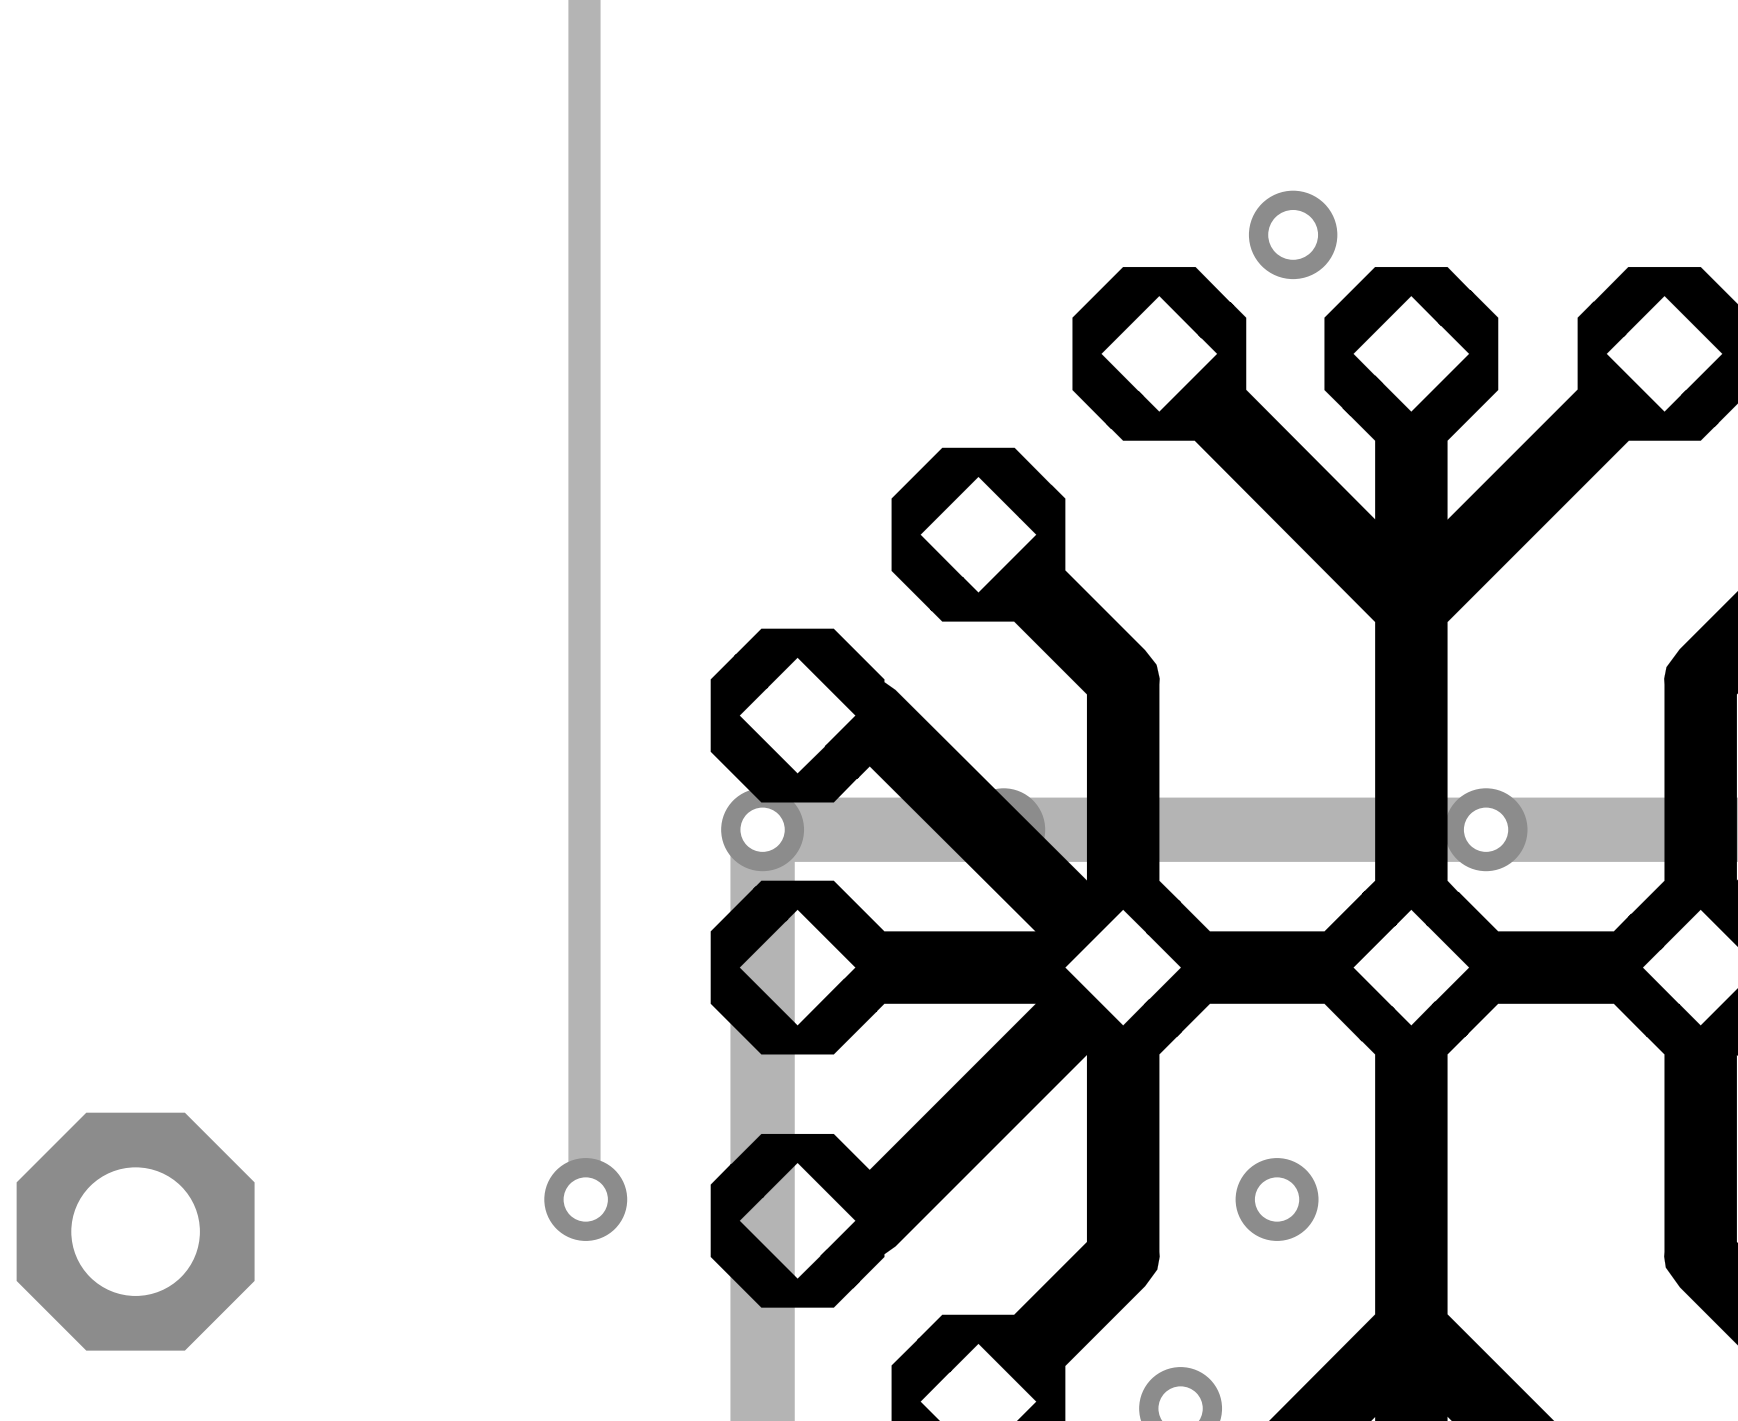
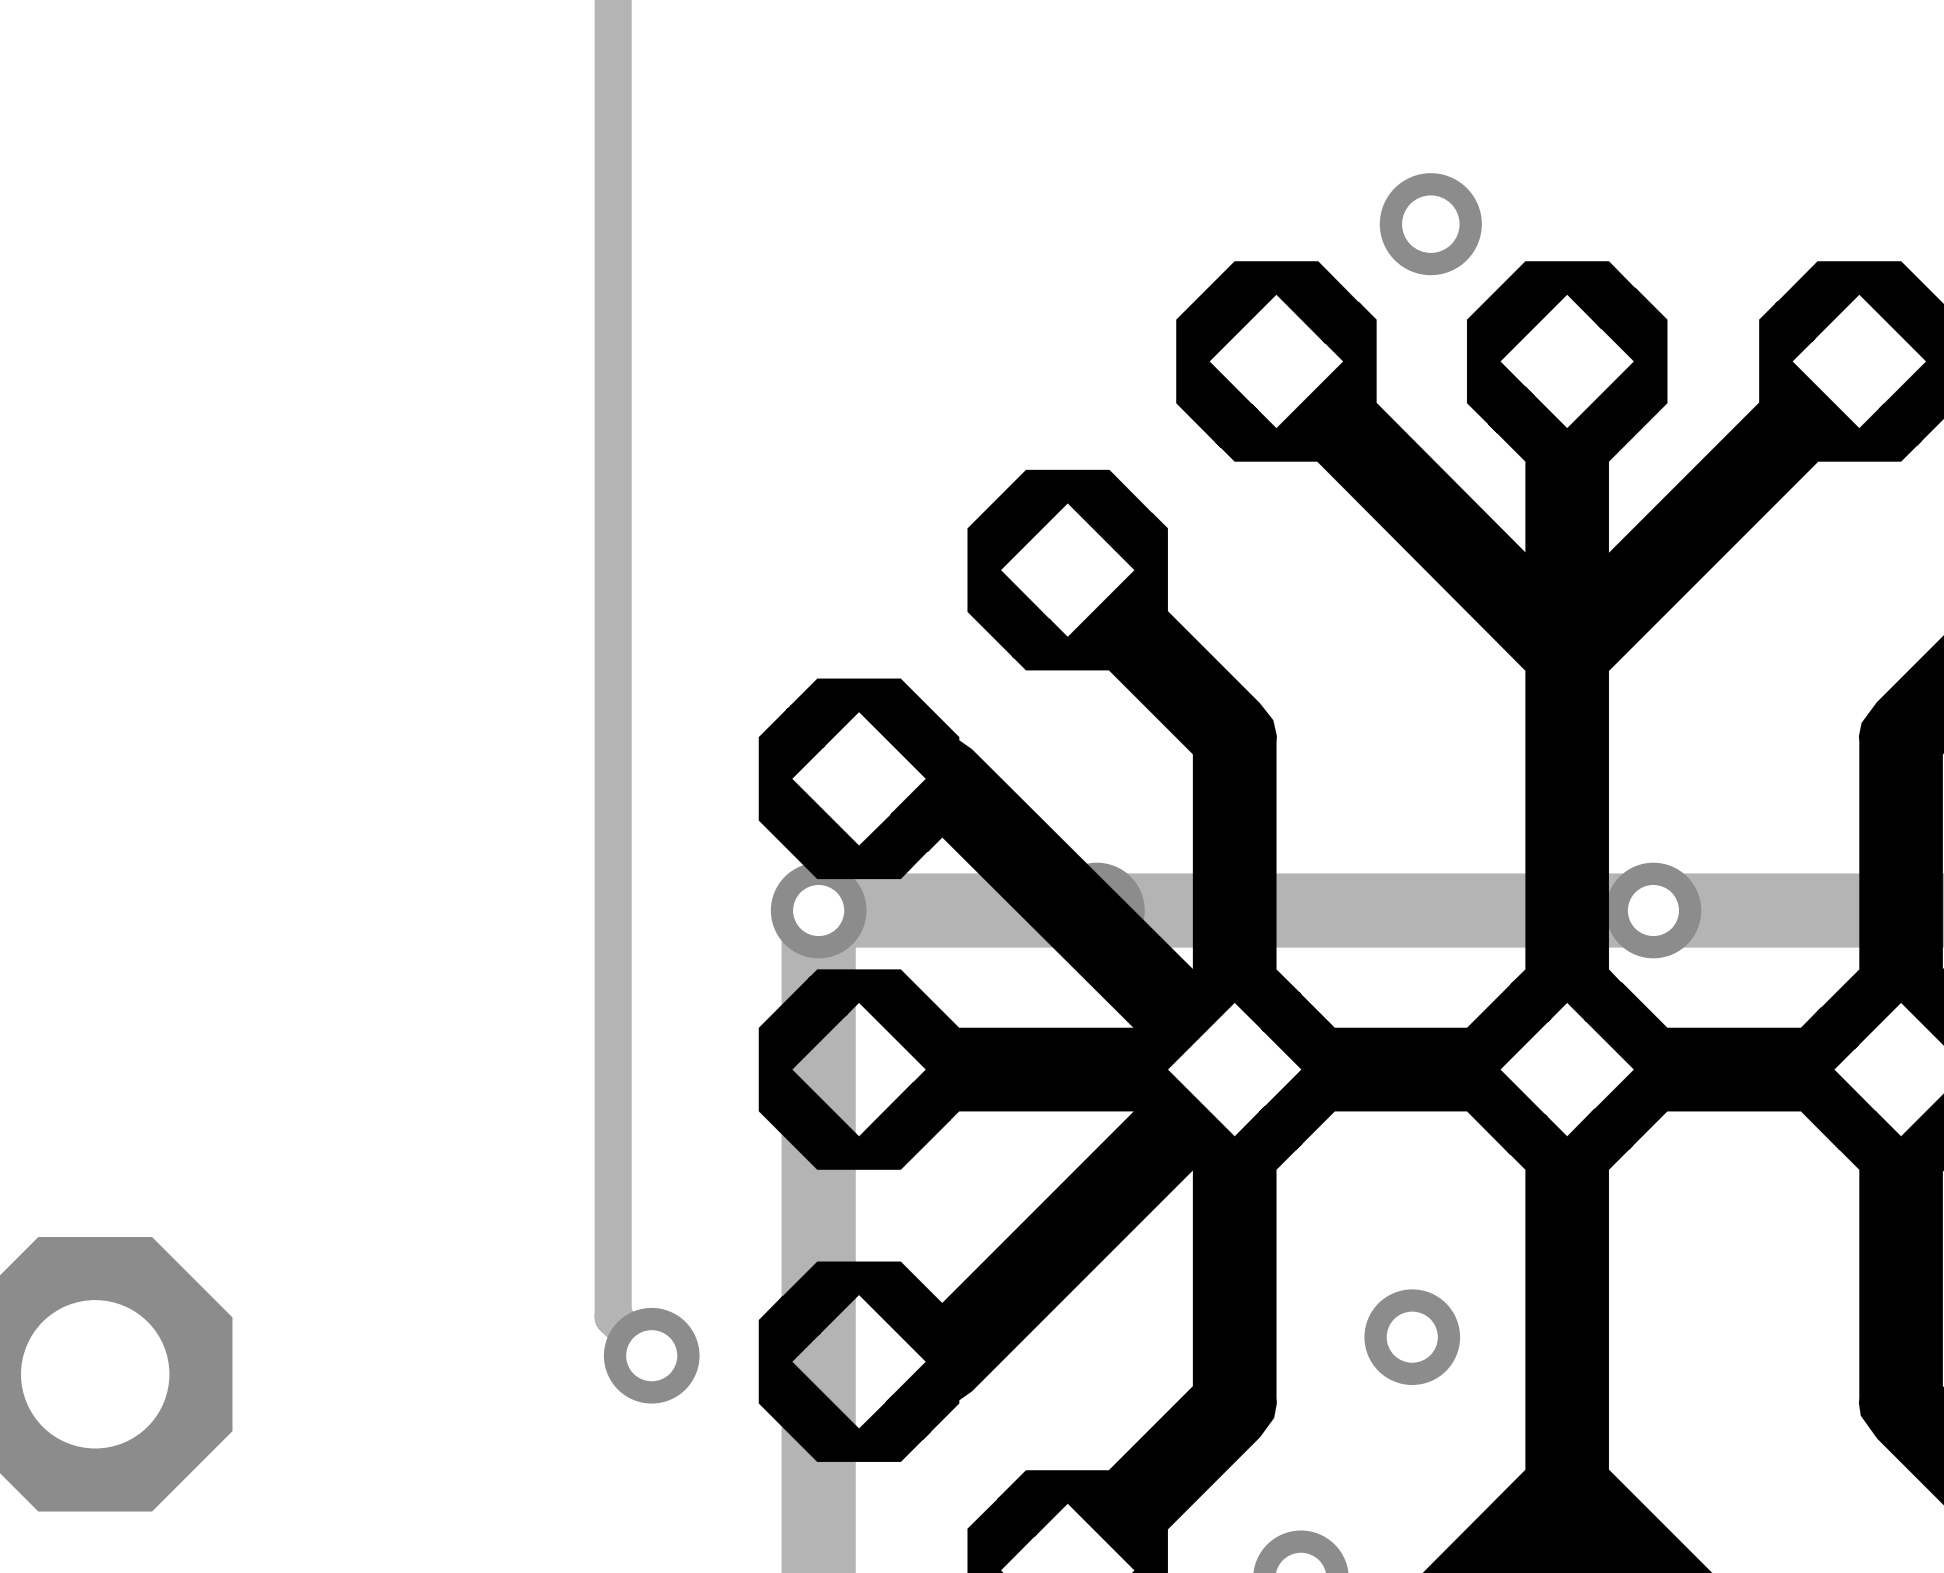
via position: (585, 1199) -> (651, 1355)

